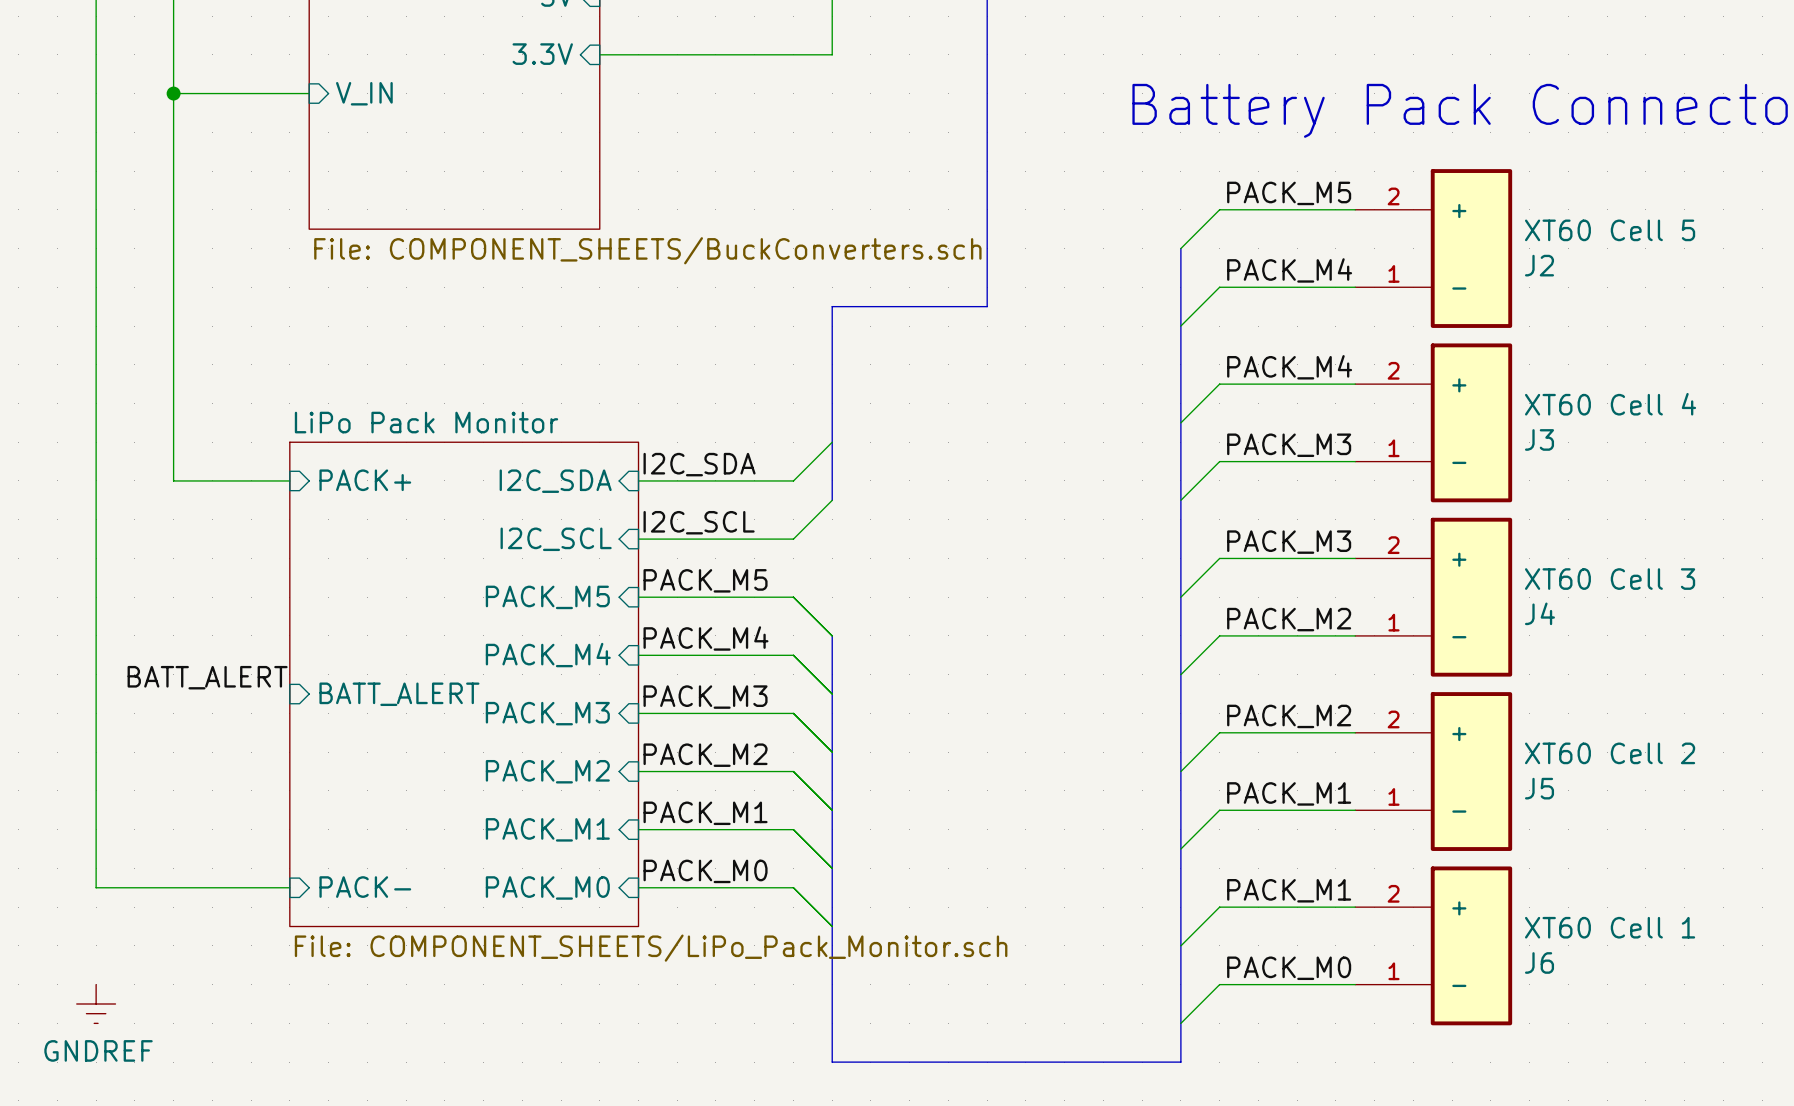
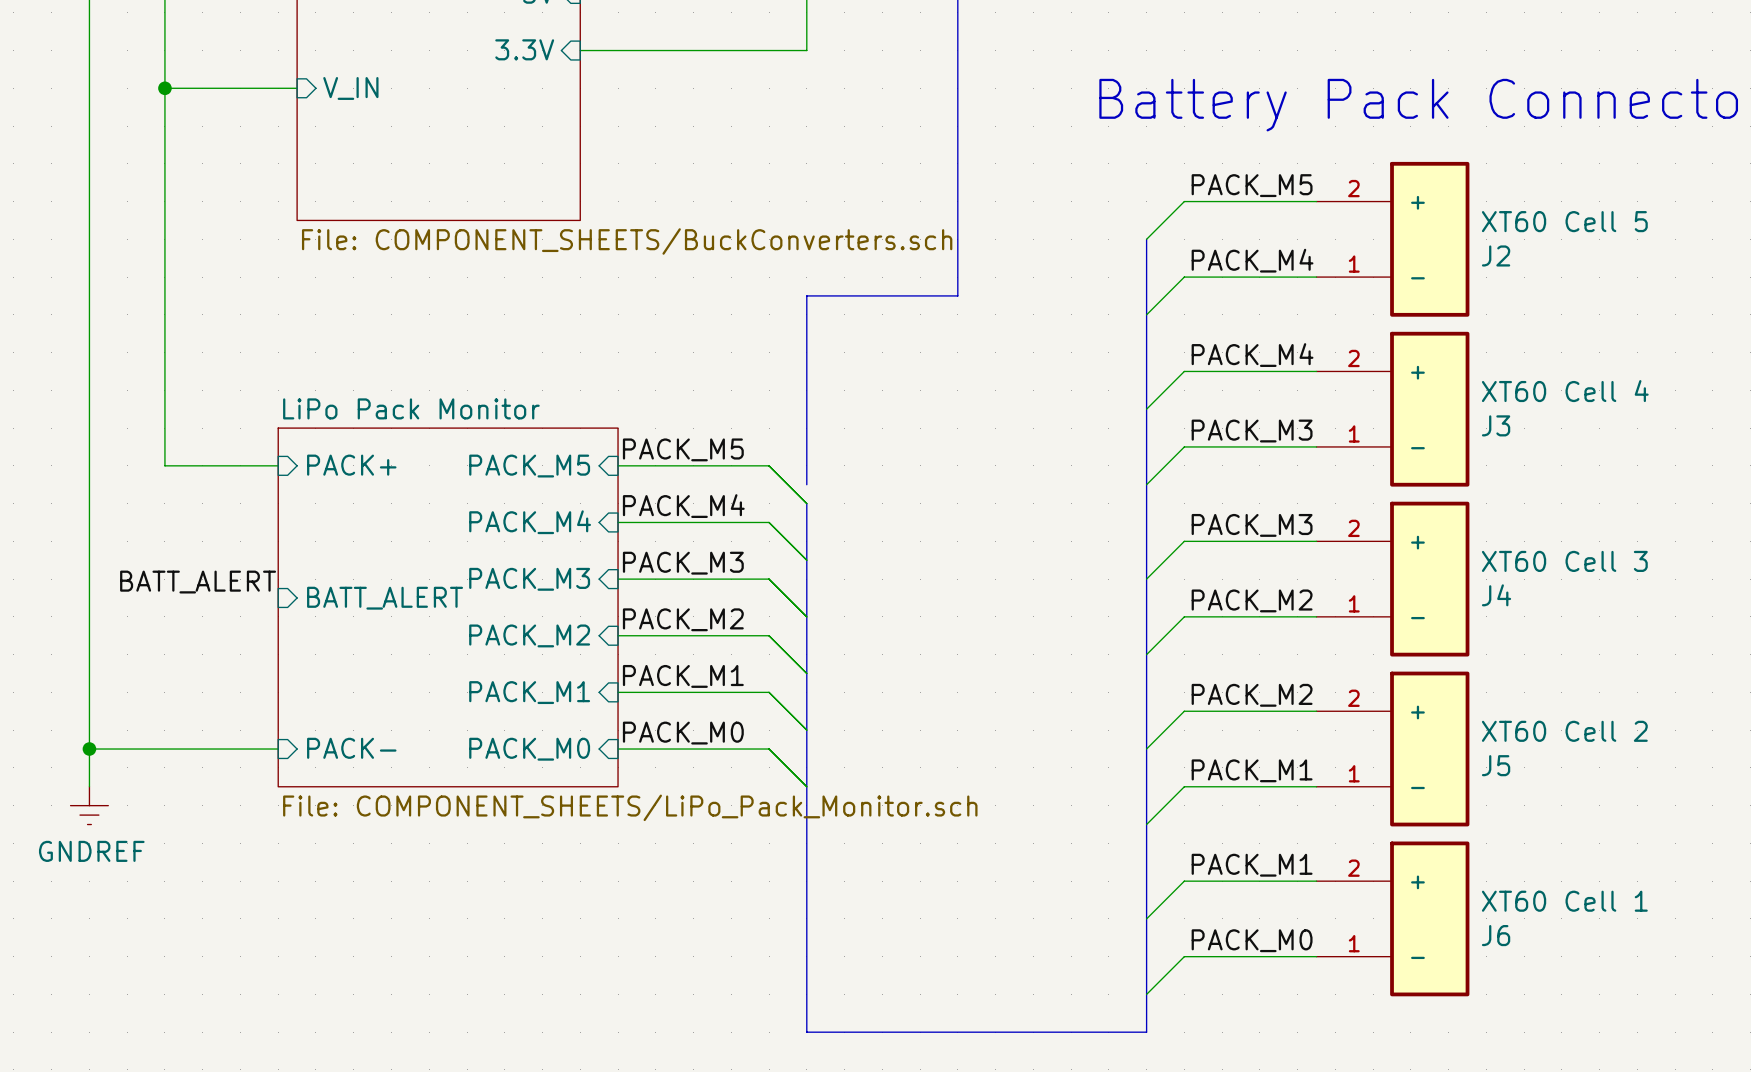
wire: (832, 442) (793, 480) -> (806, 503) (769, 465)
label: I2C_SDA (699, 464) -> PACK_M5 (683, 449)
sheet pin: I2C_SDA (555, 481) -> PACK_M5 (529, 466)
wire: (832, 500) (793, 539) -> (806, 560) (769, 522)
bus: none -> (806, 503) (806, 616)
label: I2C_SCL (699, 522) -> PACK_M4 (683, 506)
sheet pin: I2C_SCL (556, 539) -> PACK_M4 (530, 522)
label: PACK_M5 (705, 580) -> PACK_M3 (683, 563)
sheet pin: PACK_M5 (547, 597) -> PACK_M3 (529, 579)
sheet LiPo Pack Monitor: none -> File: COMPONENT_SHEETS/LiPo_Pack_Monitor.sch (448, 607)
label: PACK_M4 (705, 638) -> PACK_M2 (683, 619)
sheet pin: PACK_M4 (548, 655) -> PACK_M2 (529, 635)
label position: BATT_ALERT (207, 677) -> BATT_ALERT (198, 582)
sheet LiPo Pack Monitor: File: COMPONENT_SHEETS/LiPo_Pack_Monitor.sch (464, 684) -> none
sheet pin position: BATT_ALERT (399, 694) -> BATT_ALERT (385, 598)
label: PACK_M3 (705, 697) -> PACK_M1 (683, 676)
sheet pin: PACK_M3 (547, 713) -> PACK_M1 (529, 692)
label: PACK_M2 (705, 755) -> PACK_M0 (683, 733)
wire: none -> (89, 749) (278, 749)
junction: none -> (89, 749)
sheet pin: PACK_M2 (547, 771) -> PACK_M0 (529, 749)
wire: (96, 810) (96, 887) (289, 887) -> none
label: PACK_M1 (705, 813) -> none
sheet pin: PACK_M1 (547, 829) -> none
wire: (638, 829) (793, 829) (832, 868) -> none
label: PACK_M0 (705, 871) -> none
sheet pin position: PACK- (365, 887) -> PACK- (351, 748)
sheet pin: PACK_M0 (547, 887) -> none
wire: (638, 887) (793, 887) (832, 926) -> none
power symbol position: GNDREF (96, 1003) -> GNDREF (89, 805)

